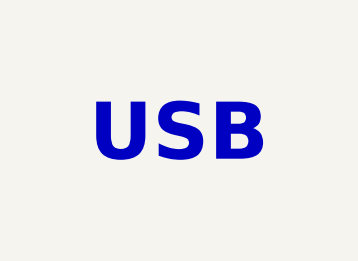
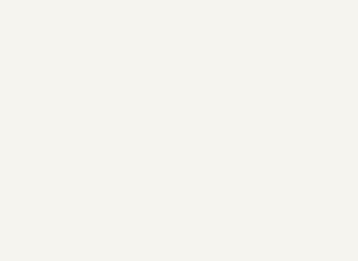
text: USB (179, 130) -> none

